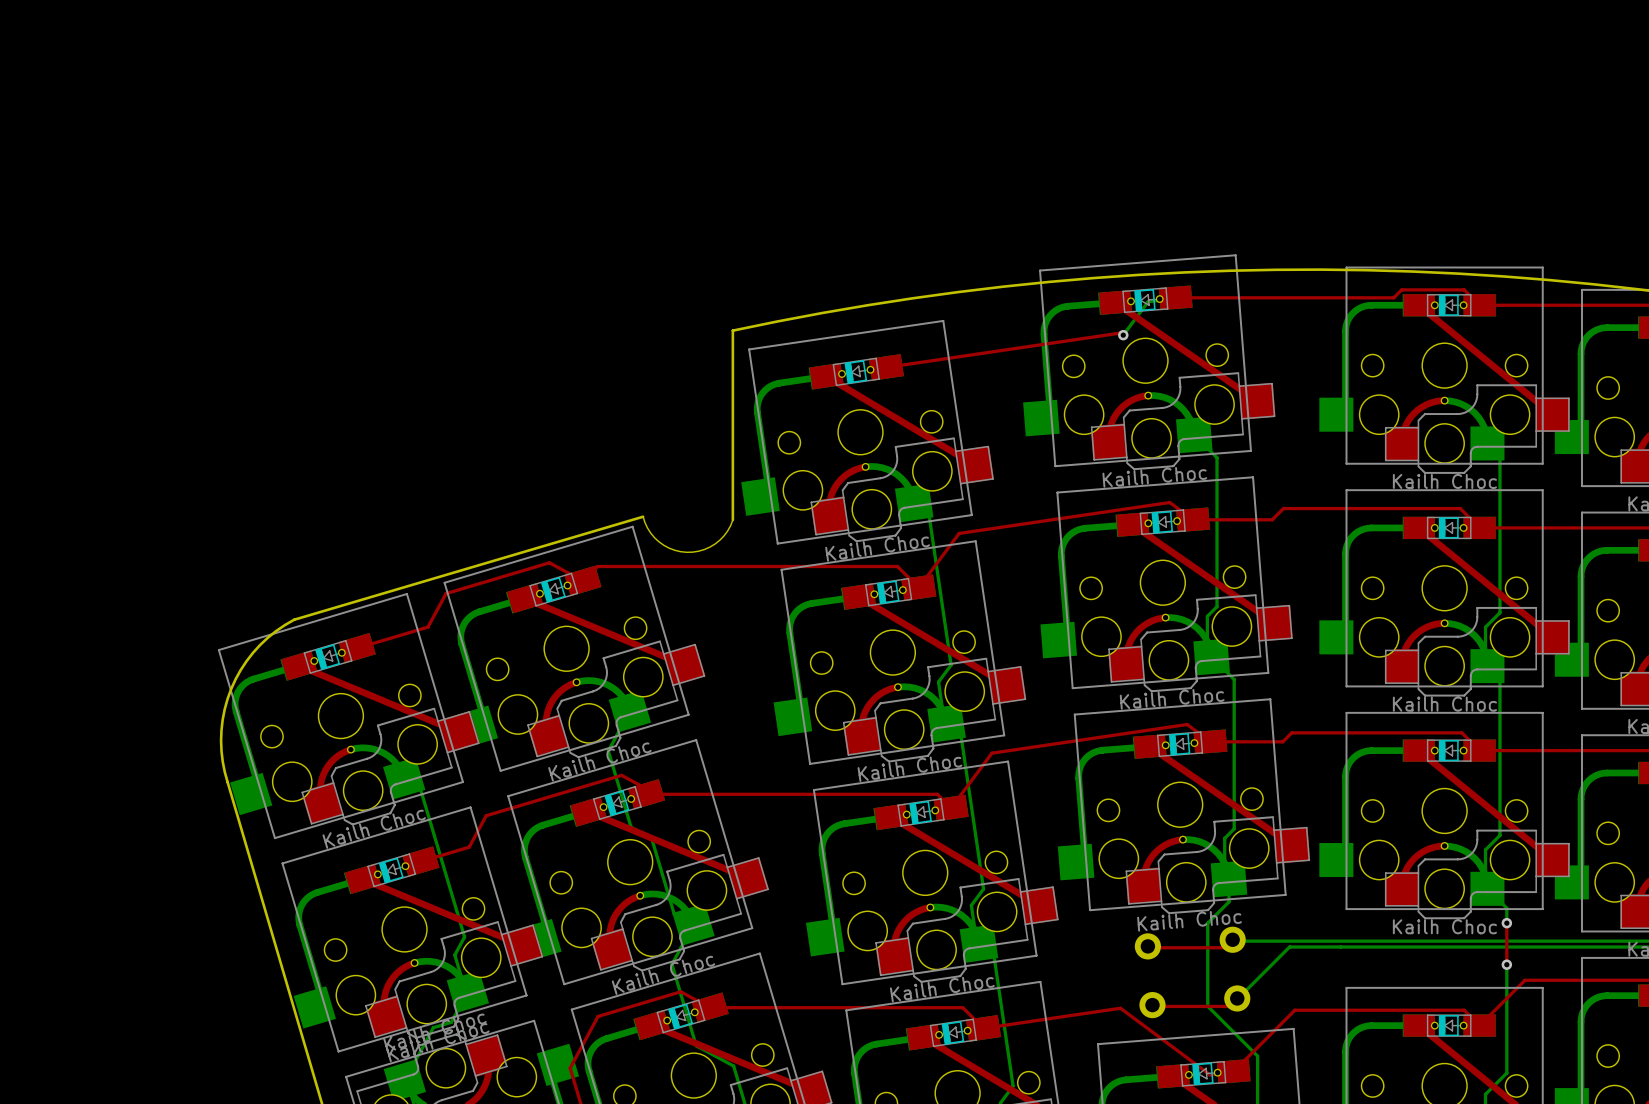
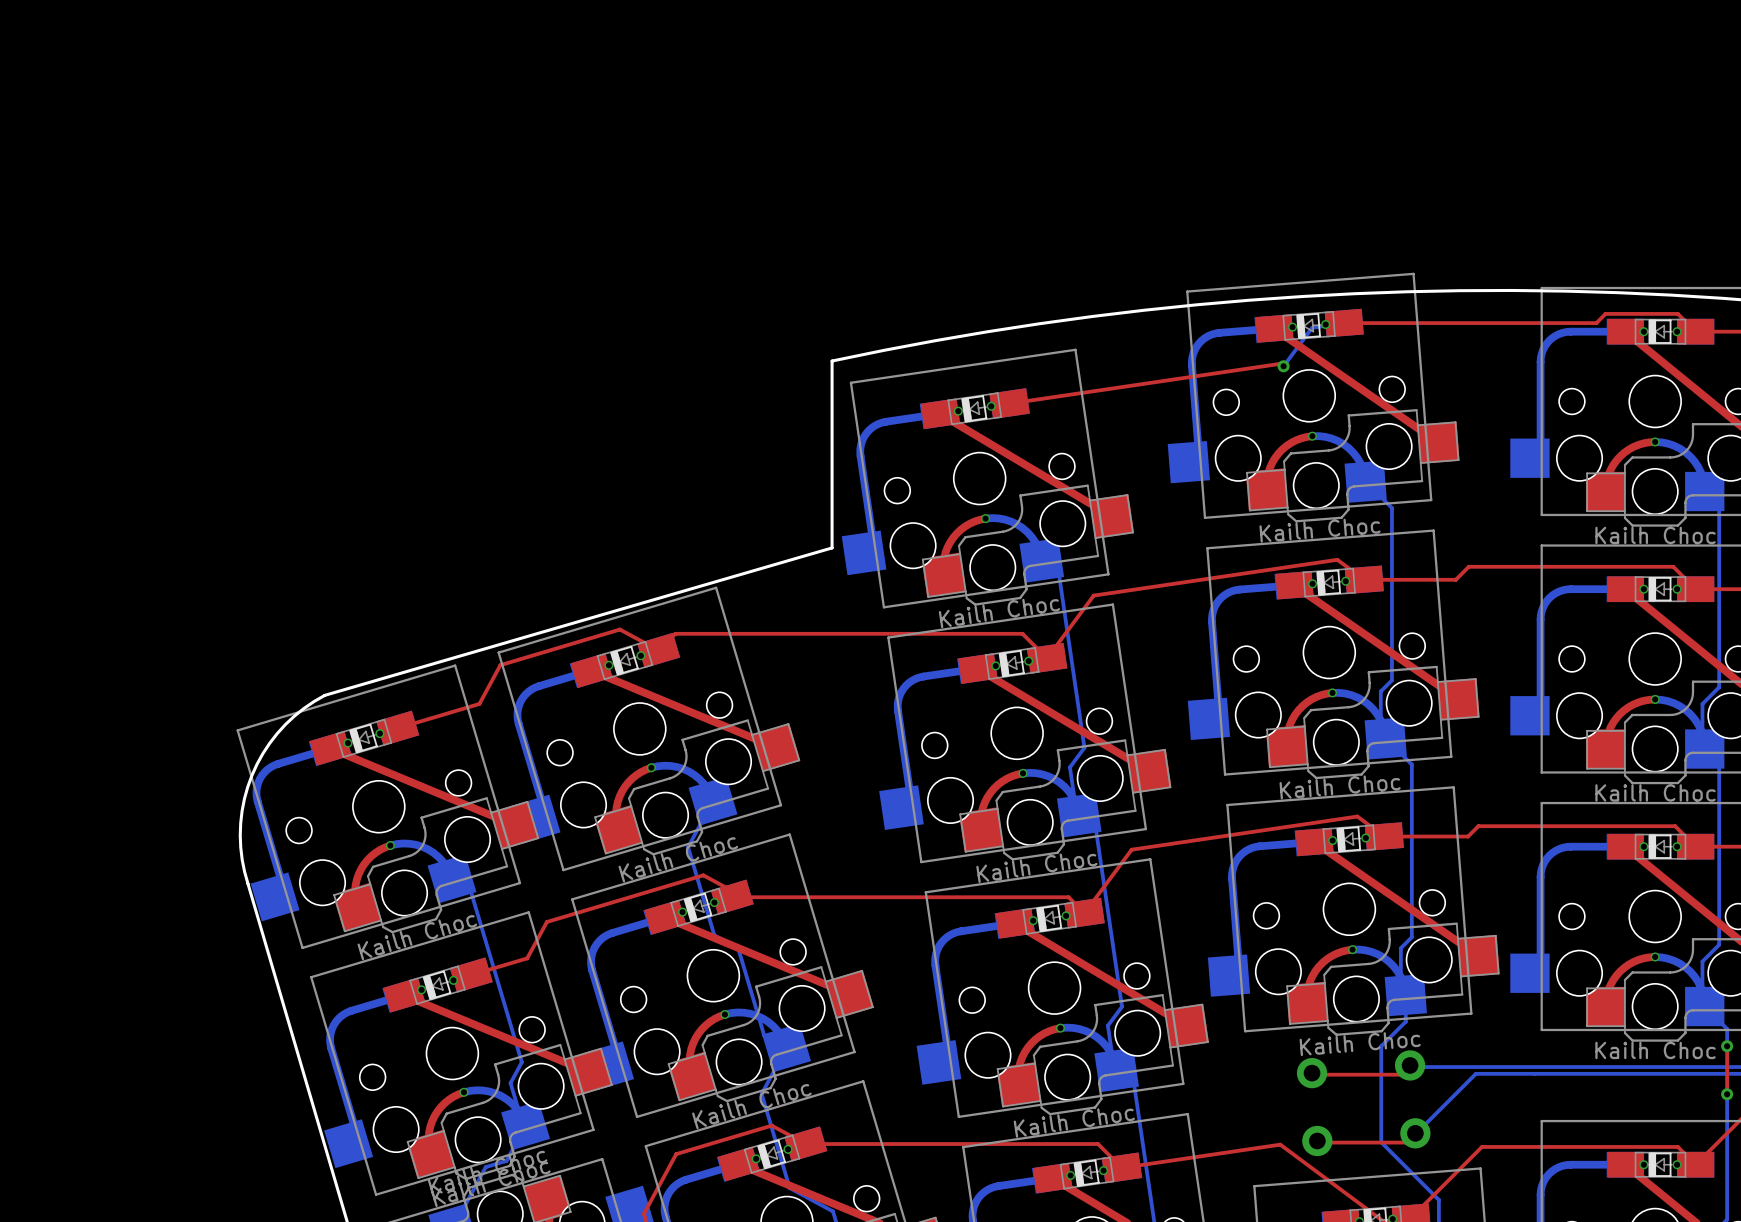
board edge: (732, 492) (732, 520) (727, 530) (715, 543) (698, 551) (680, 551) (663, 545) (650, 533) (643, 516) (294, 619) -> (832, 547) (324, 695)

